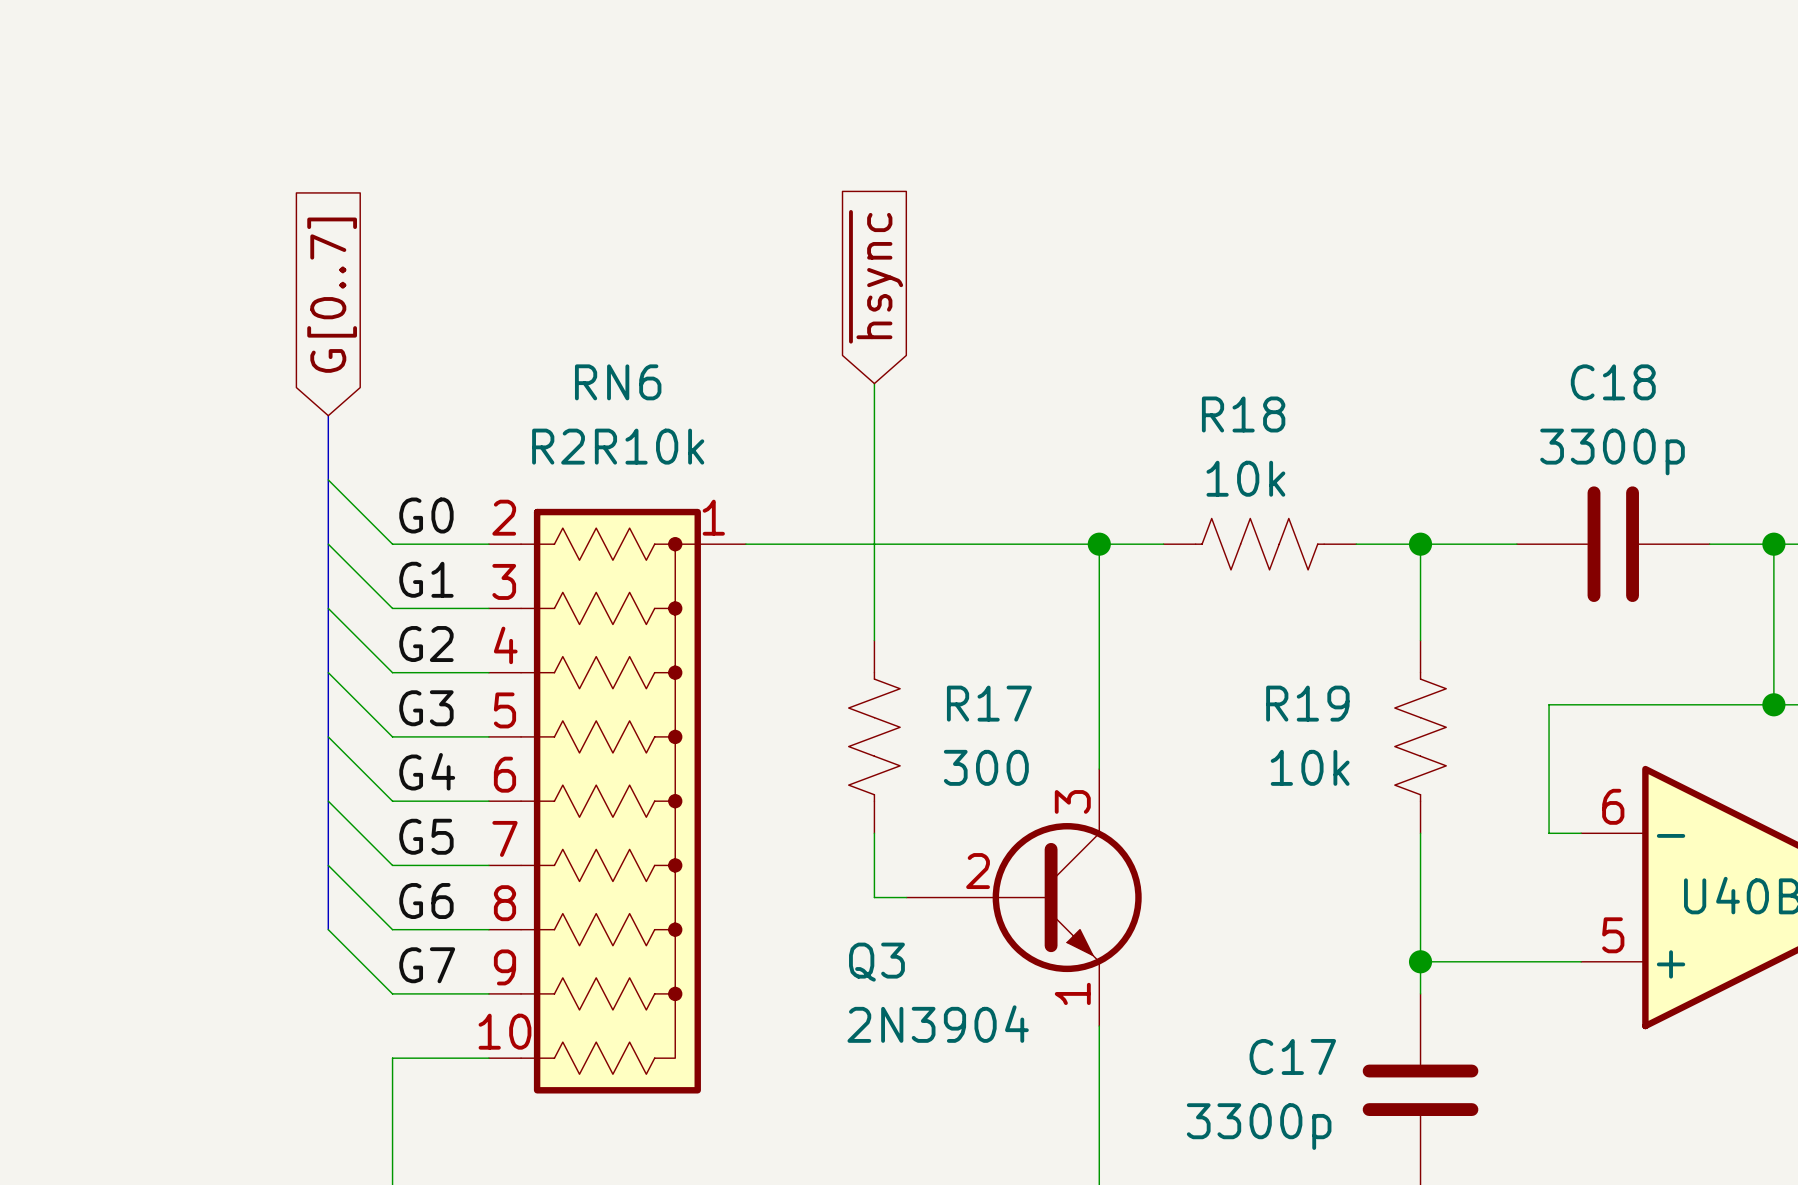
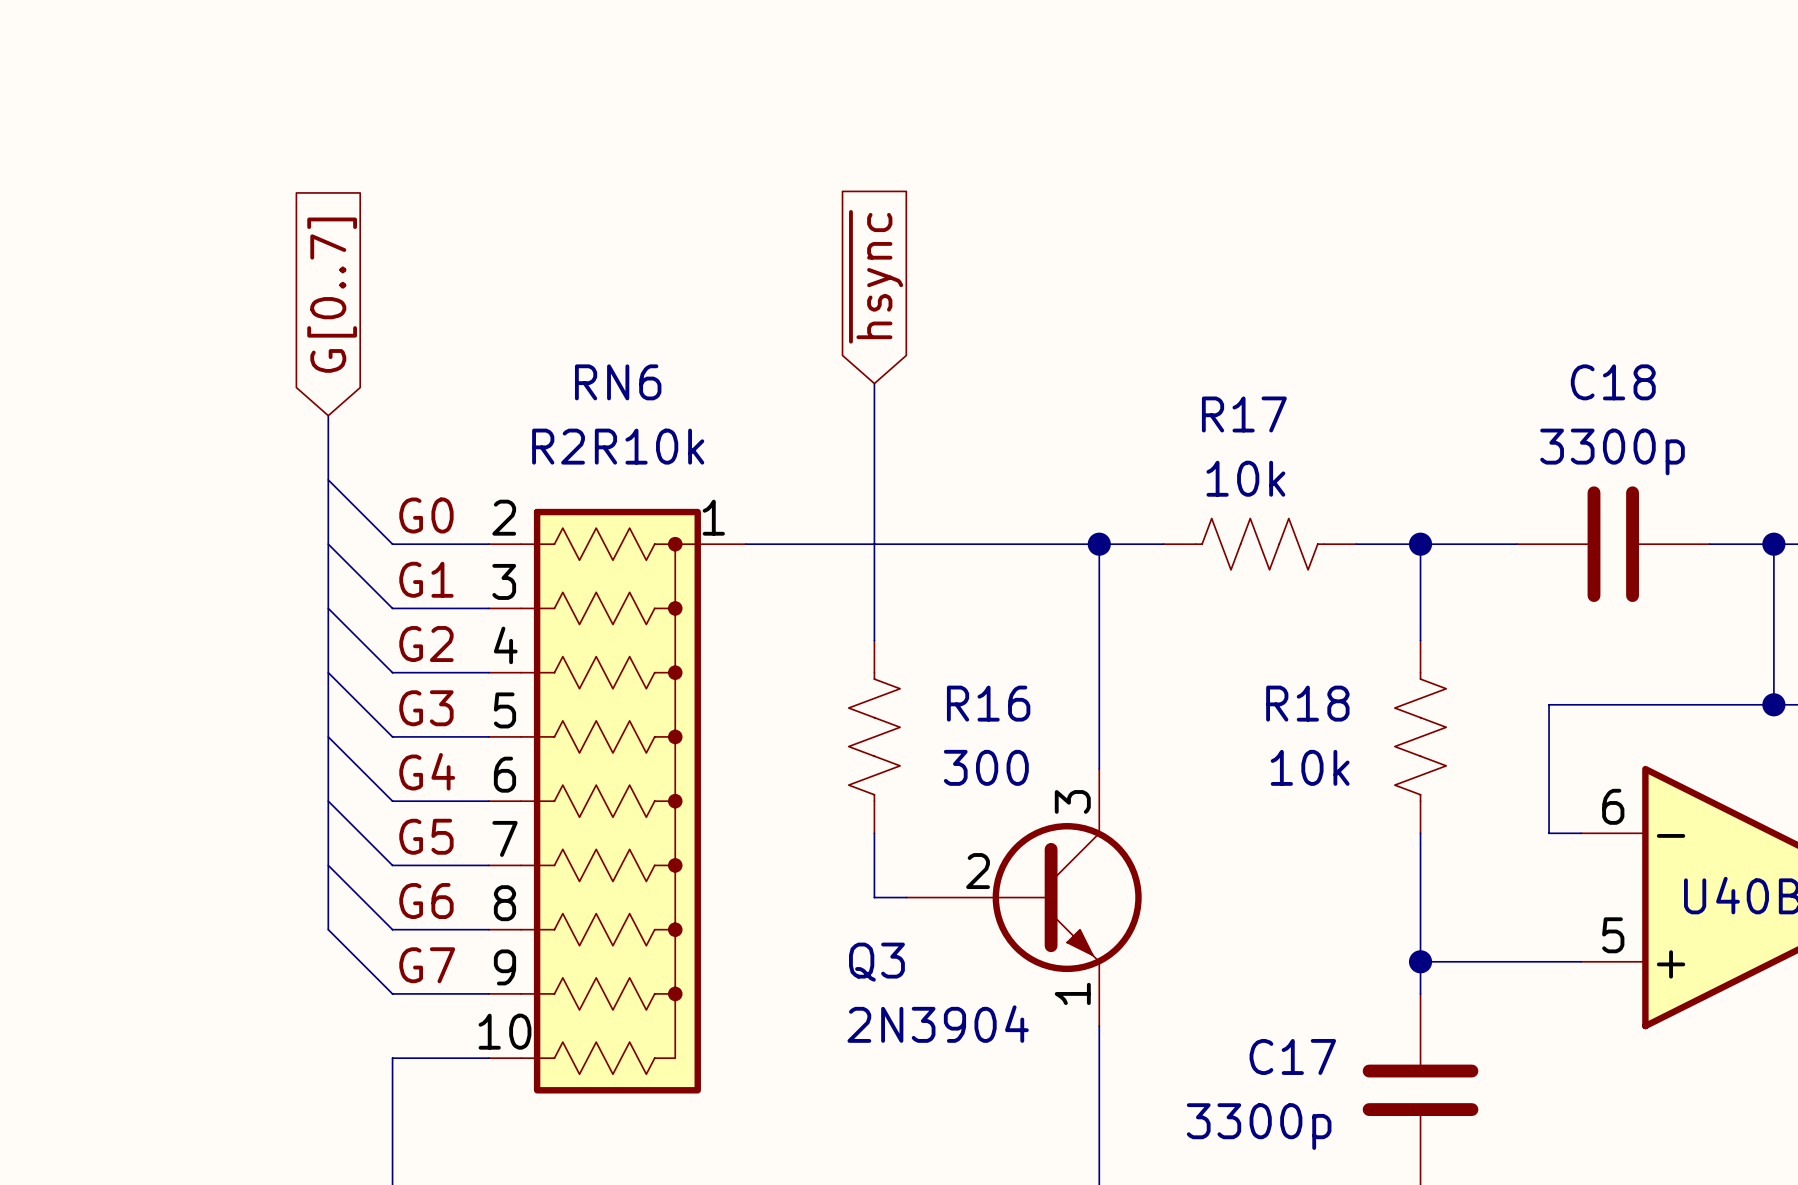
R18 name: R18 (1243, 414) -> R17 (1244, 414)
R17 name: R17 (989, 703) -> R16 (988, 703)
R19 name: R19 (1307, 703) -> R18 (1307, 703)

